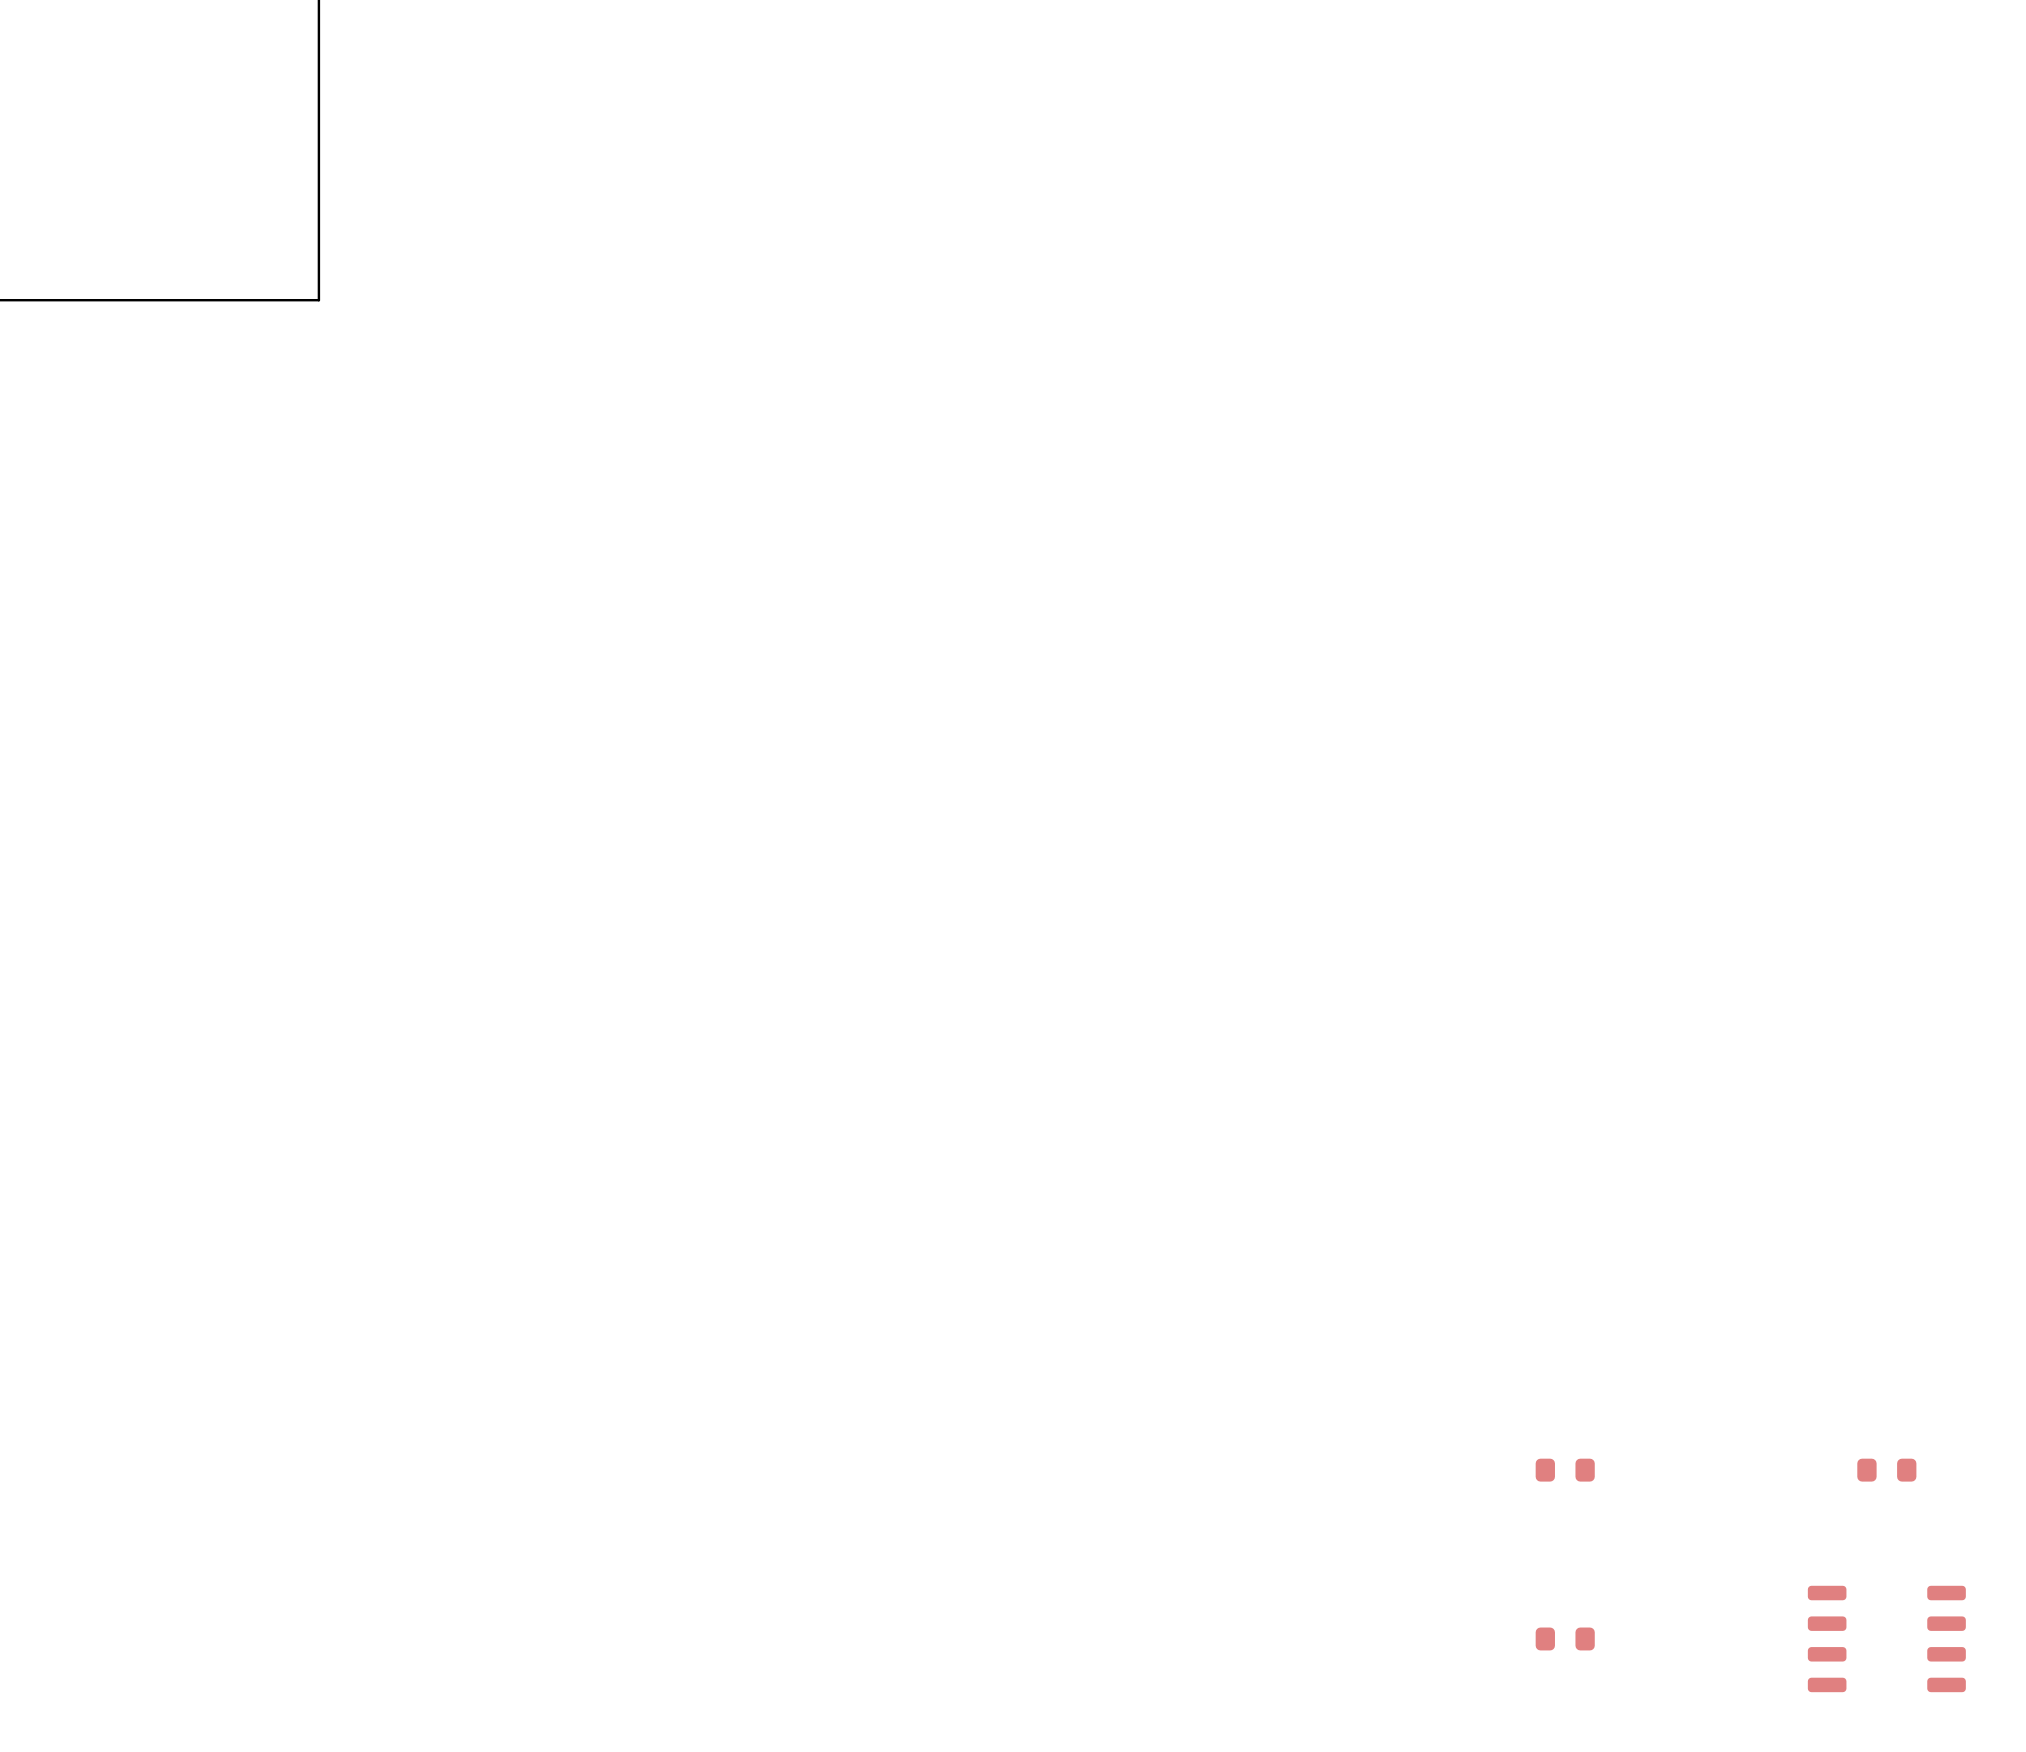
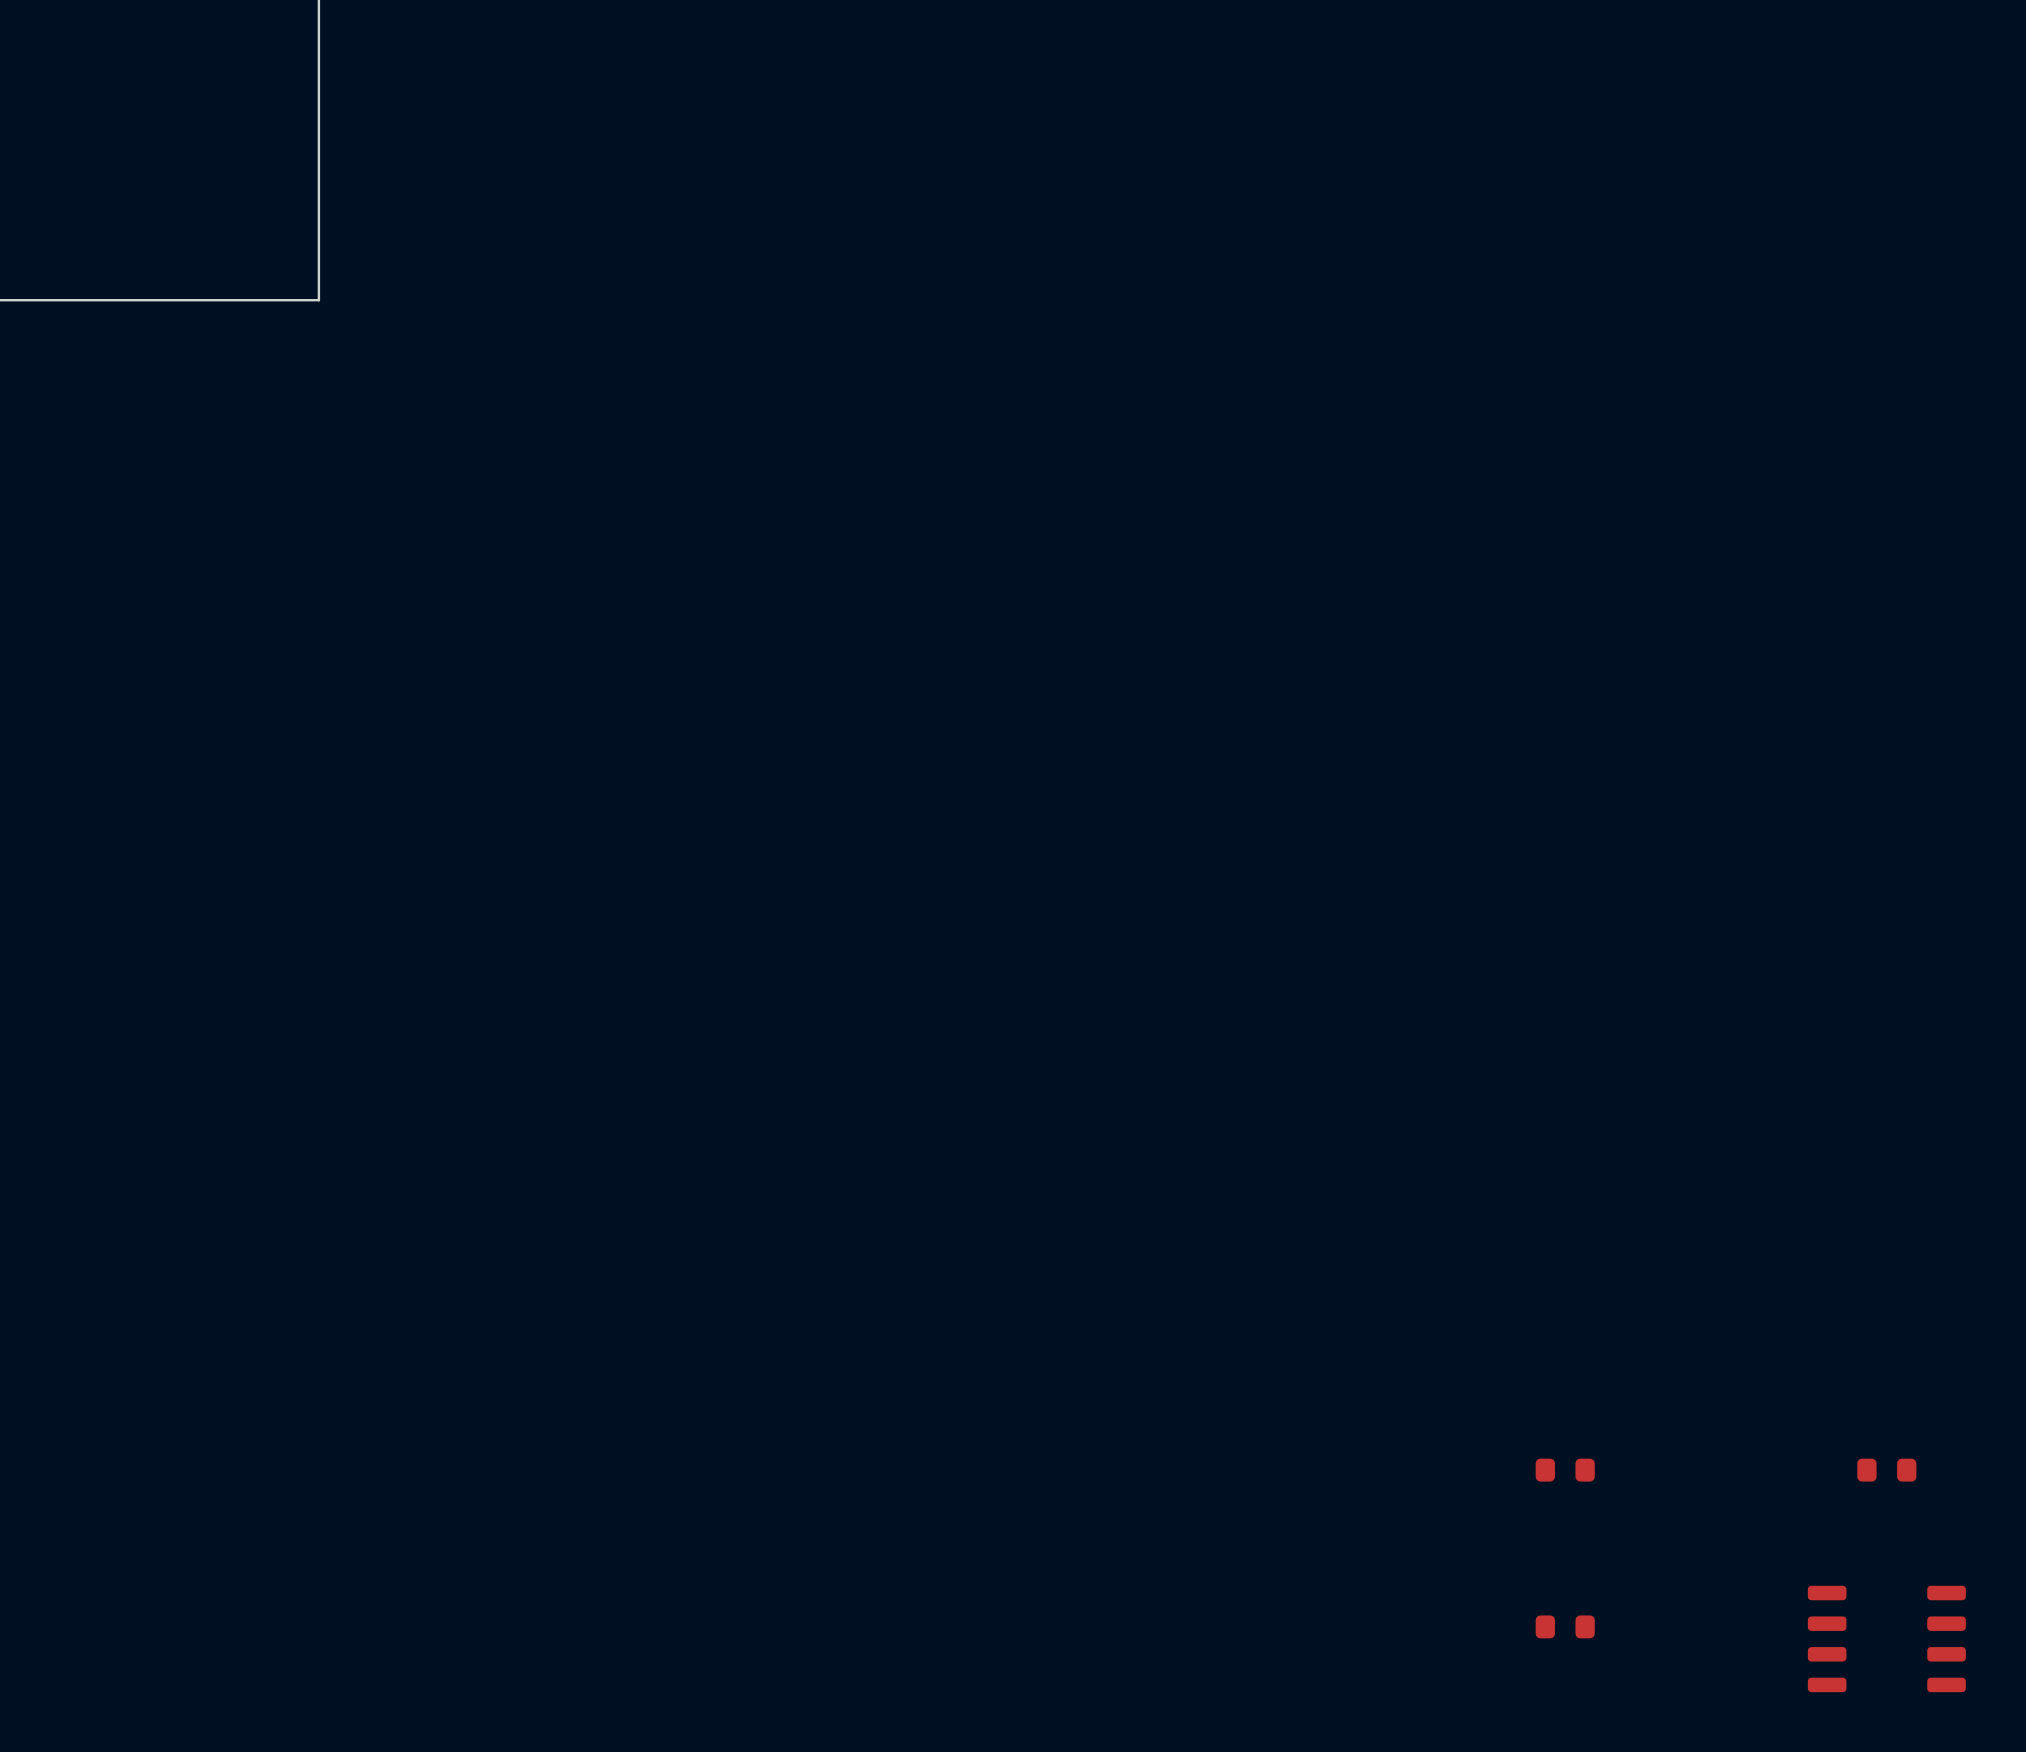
part position: (1565, 1638) -> (1565, 1626)

